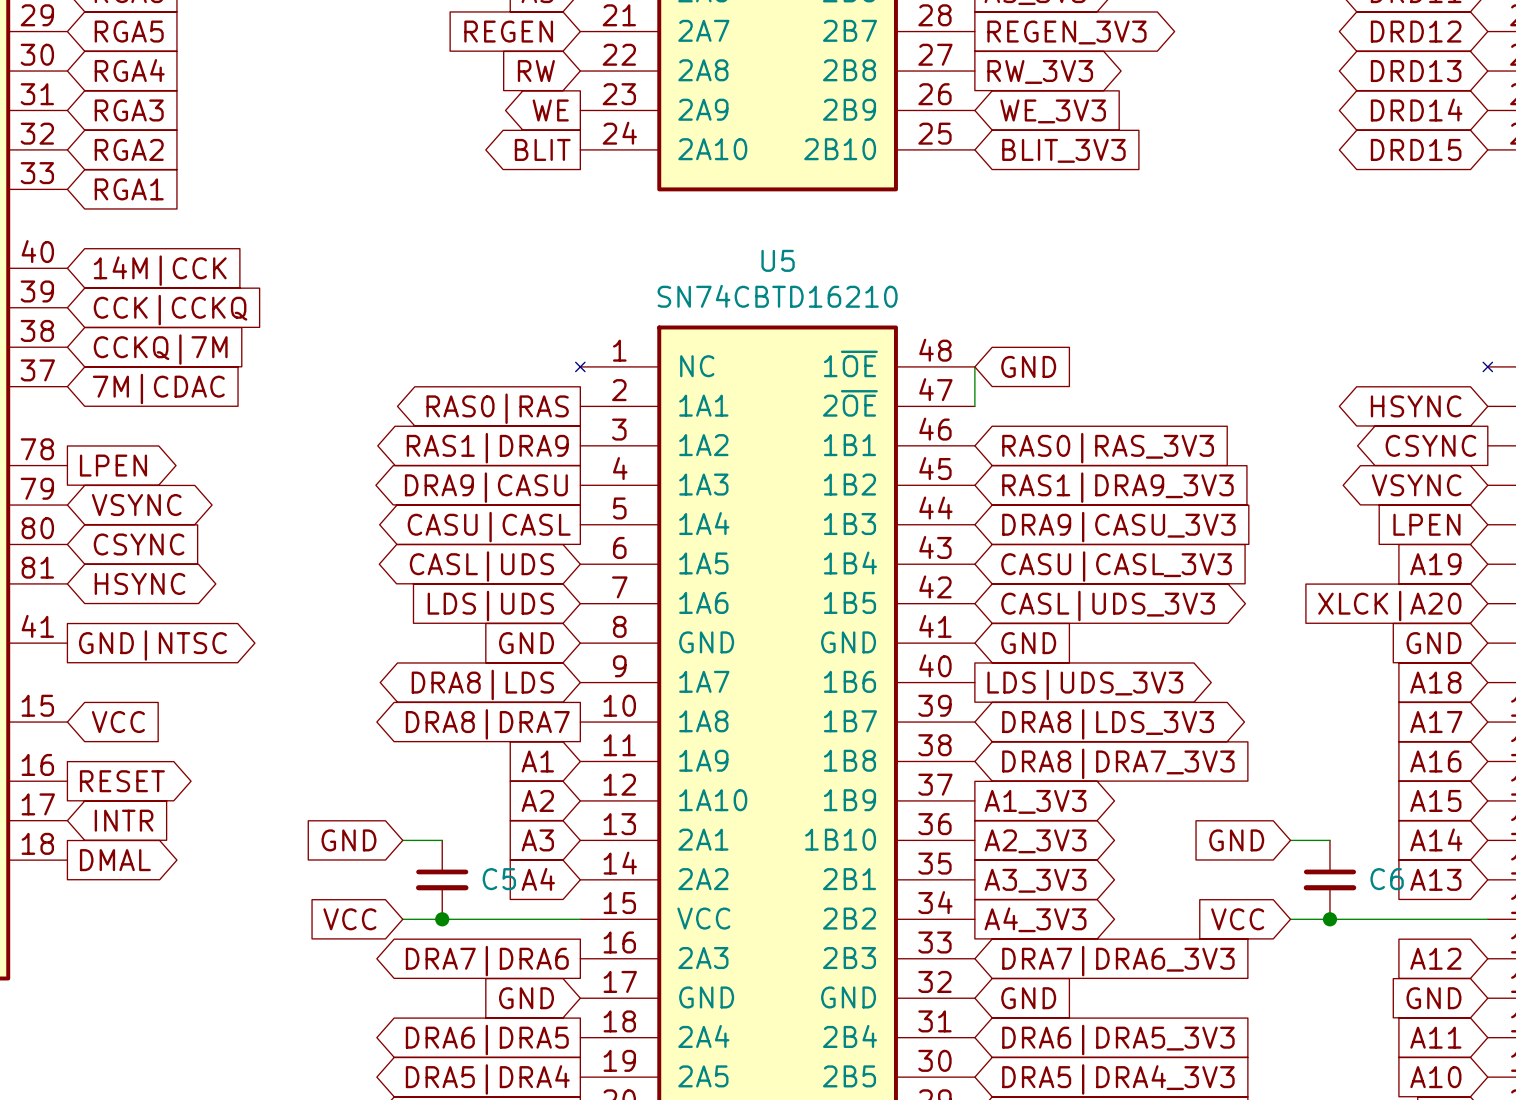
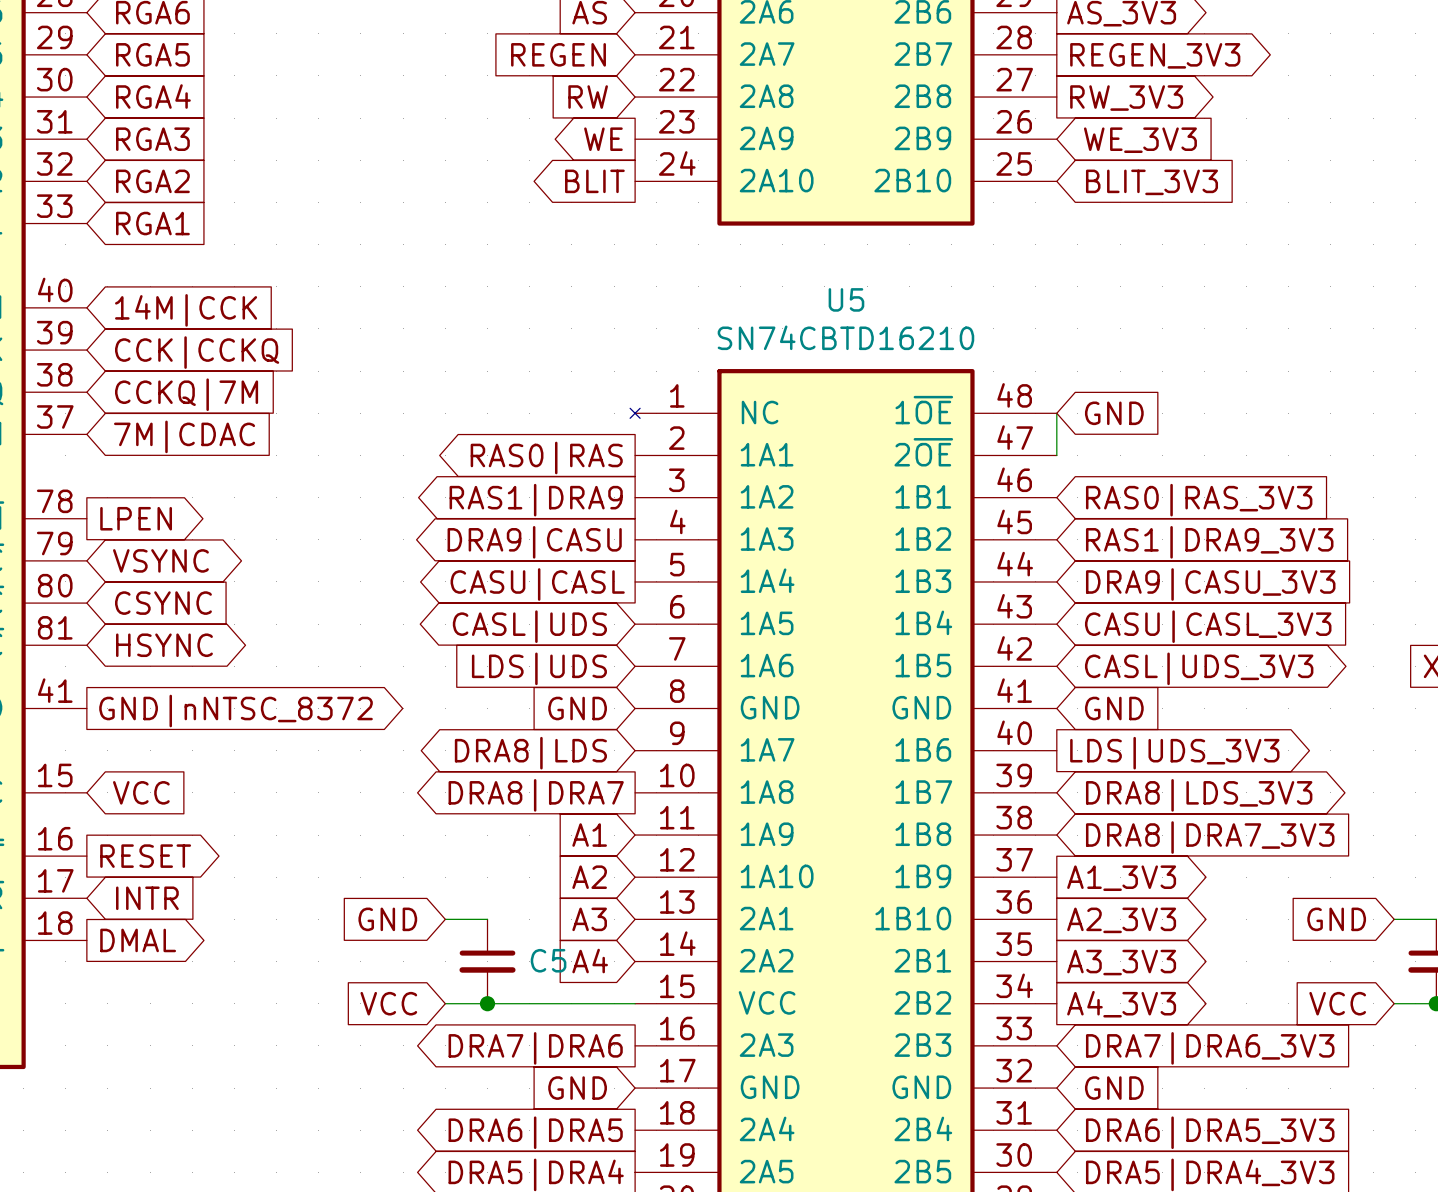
global label: GND|NTSC (152, 645) -> GND|nNTSC_8372 (236, 711)

